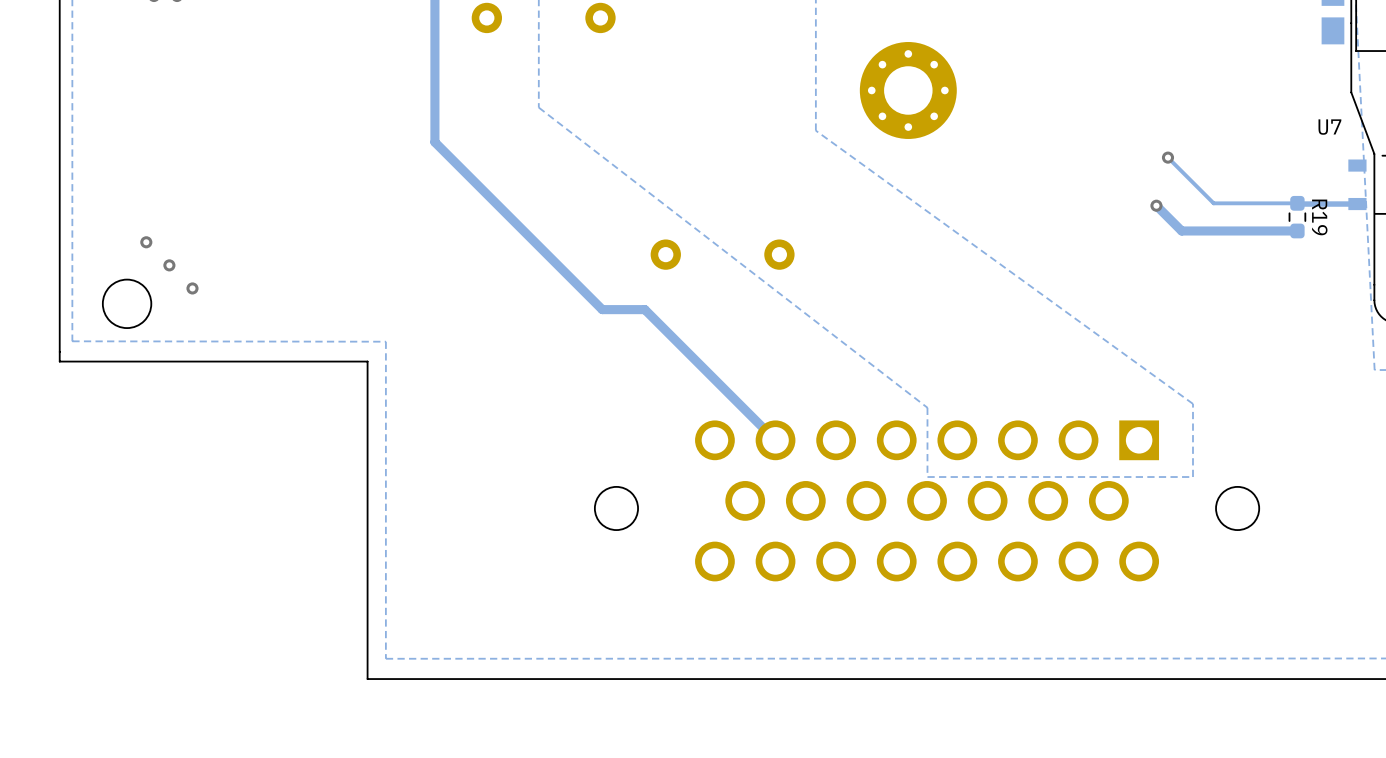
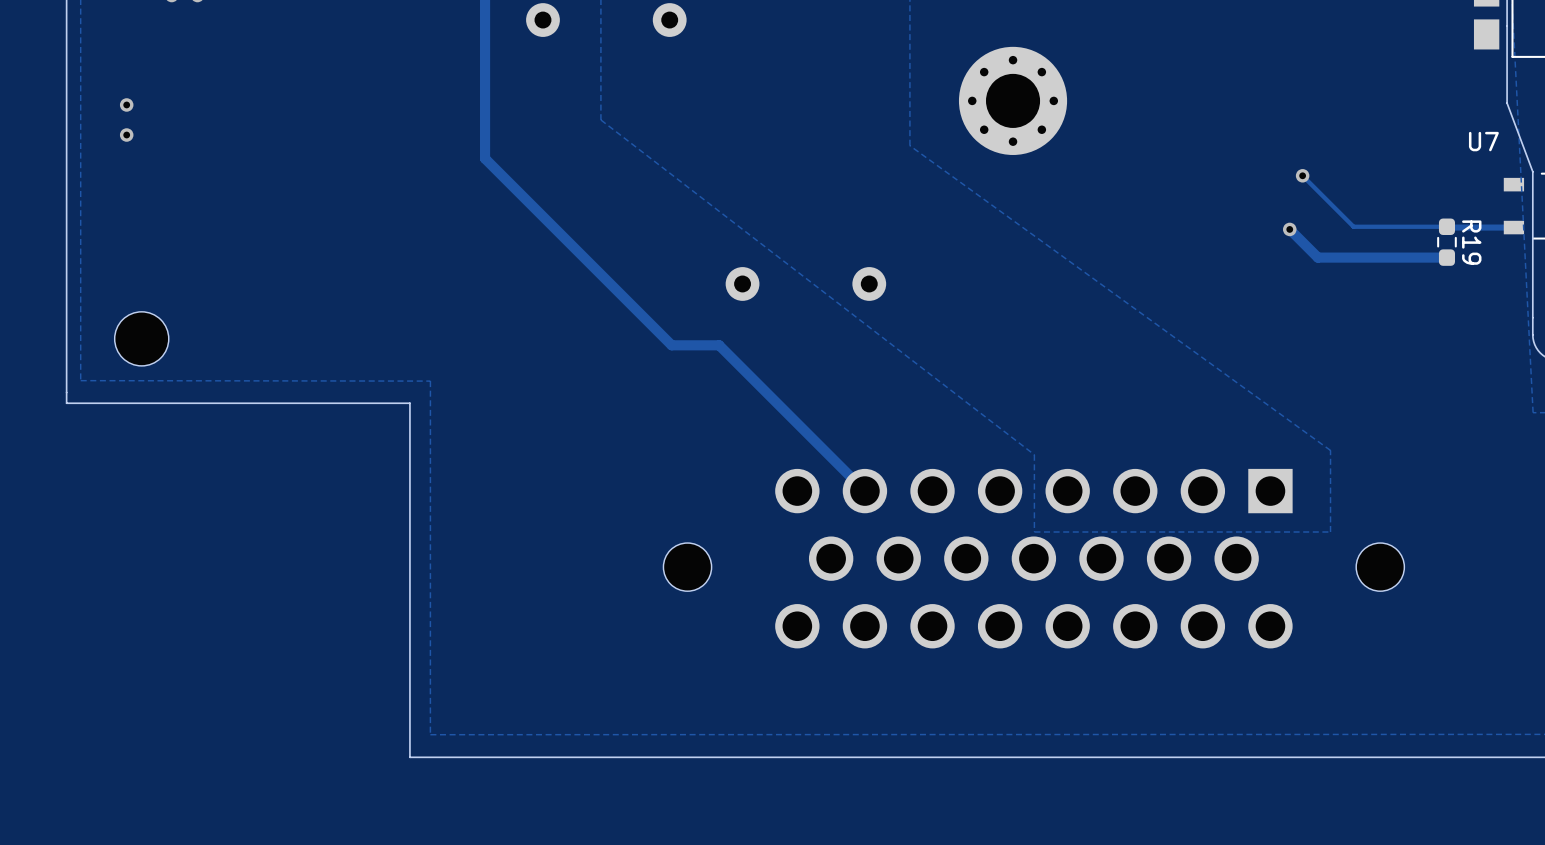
via: none -> (126, 104)
via: none -> (126, 135)
via: (146, 242) -> none
via: (169, 265) -> none
via: (192, 288) -> none

